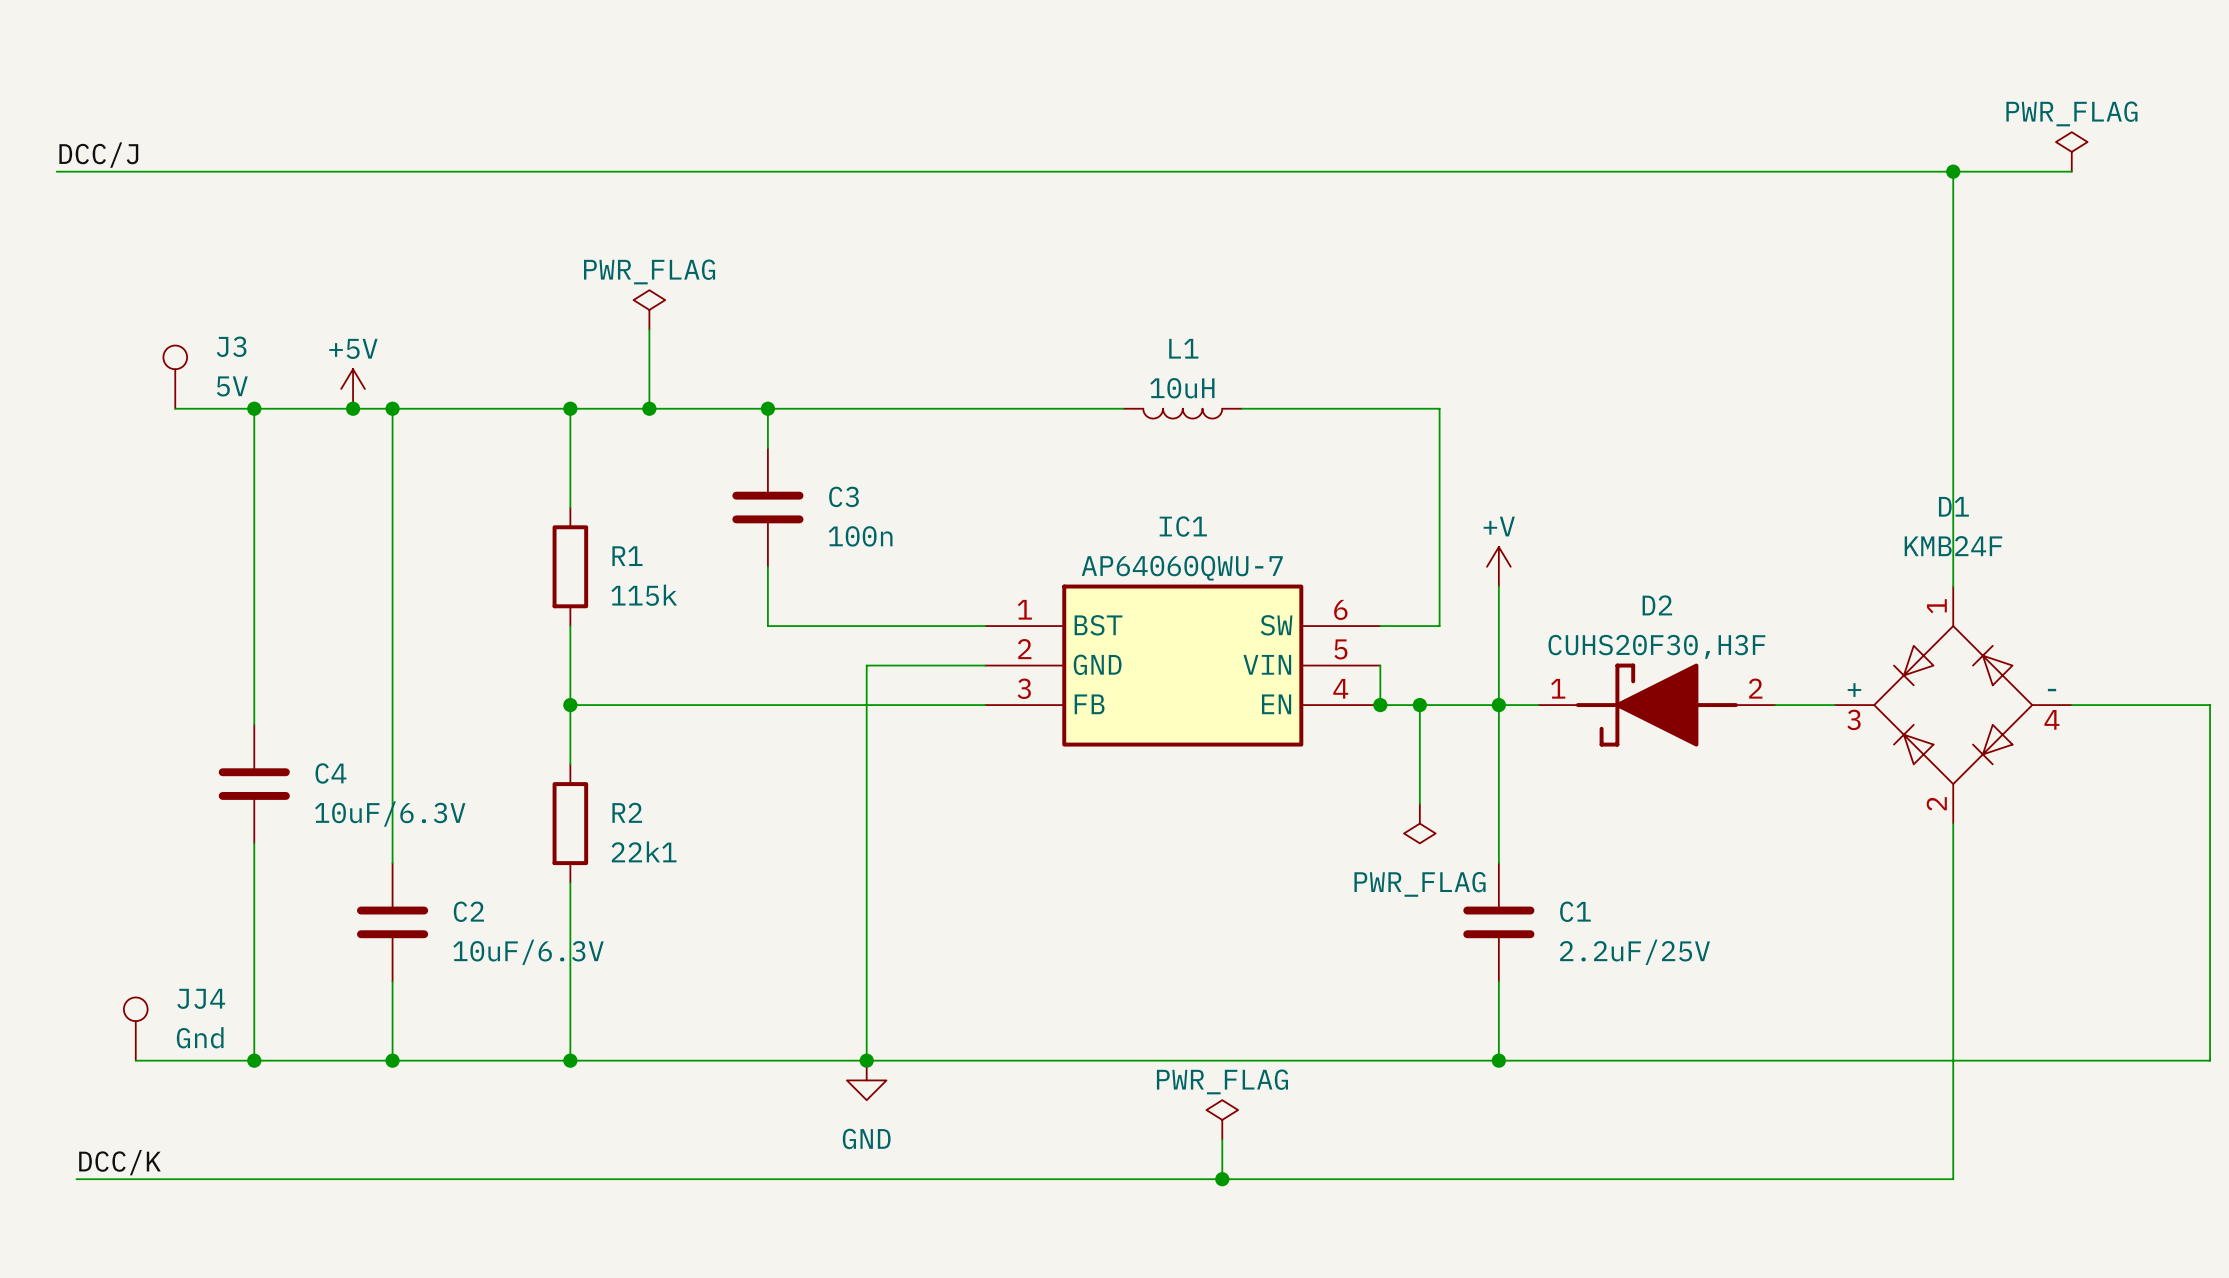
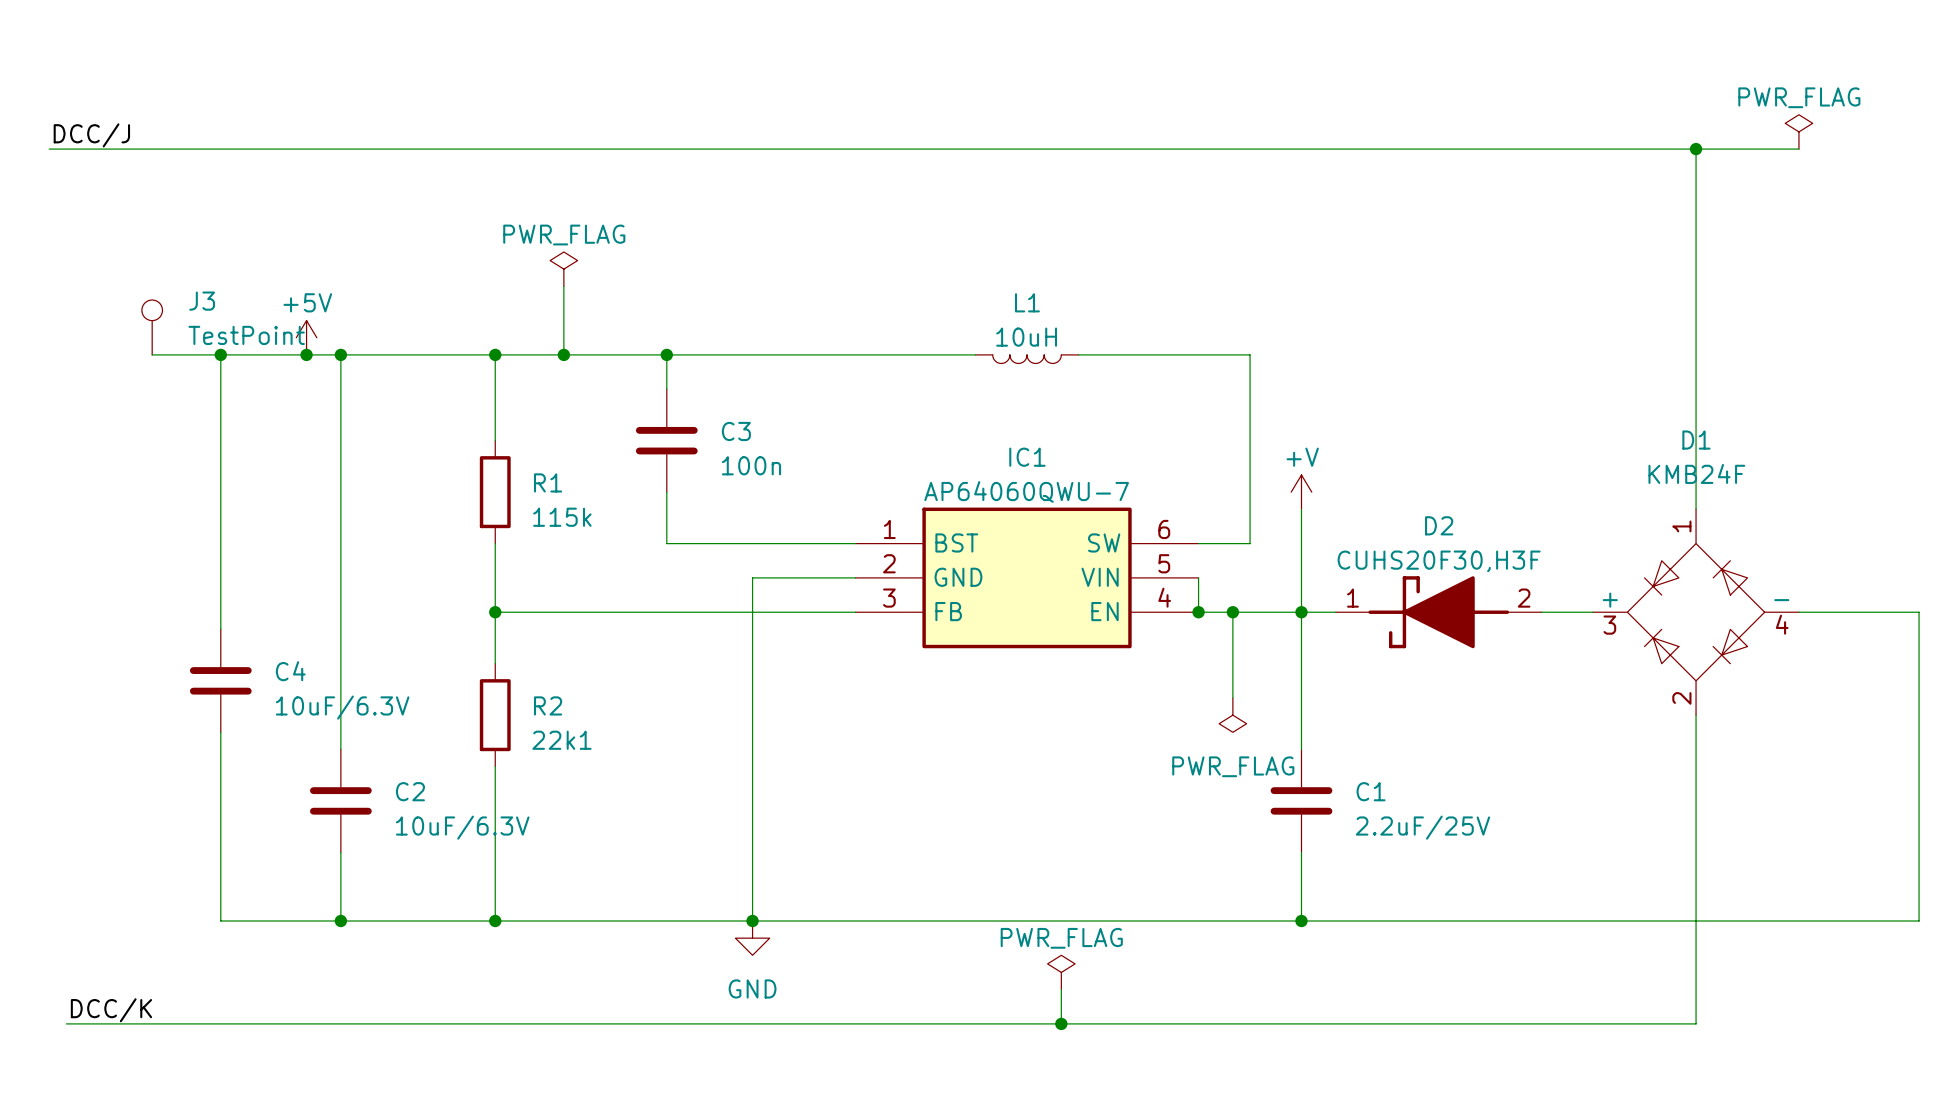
J3 value: 5V (232, 386) -> TestPoint (246, 335)
JJ4: Gnd (135, 1029) -> none
wire: (135, 1060) (254, 1060) -> none
junction: (254, 1060) -> none

